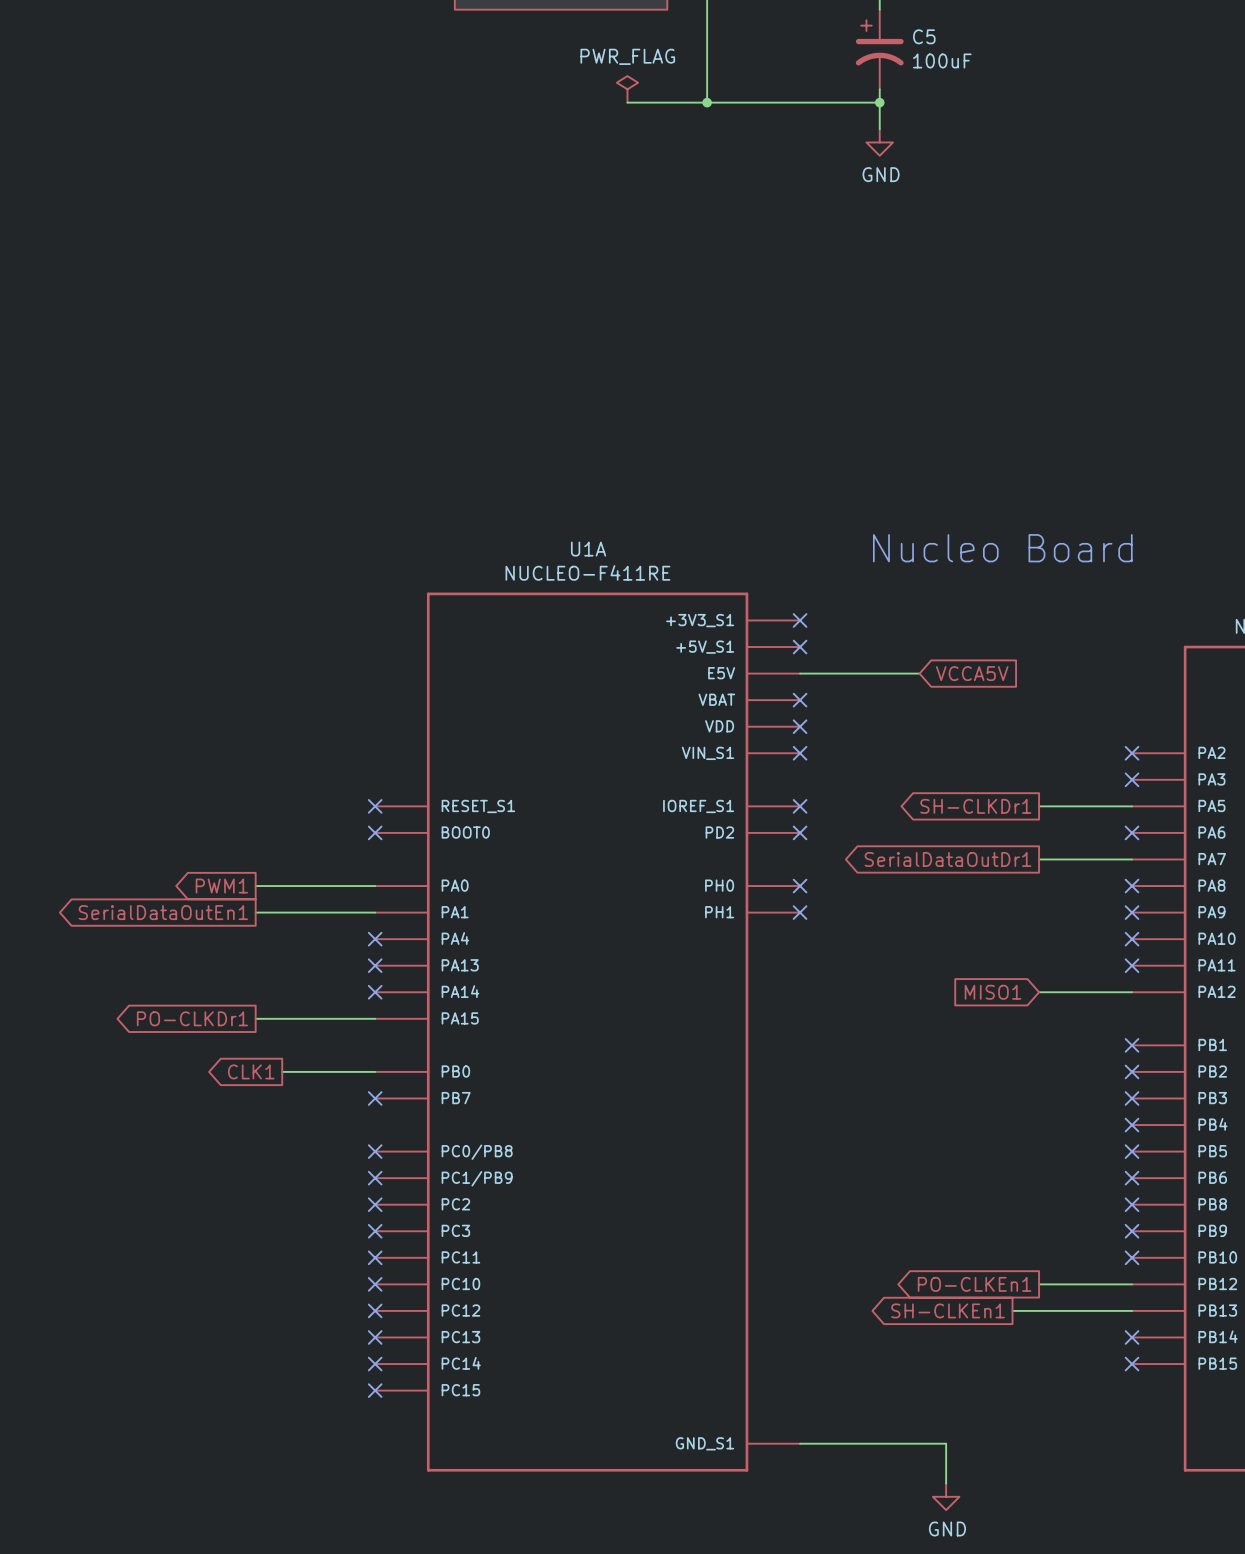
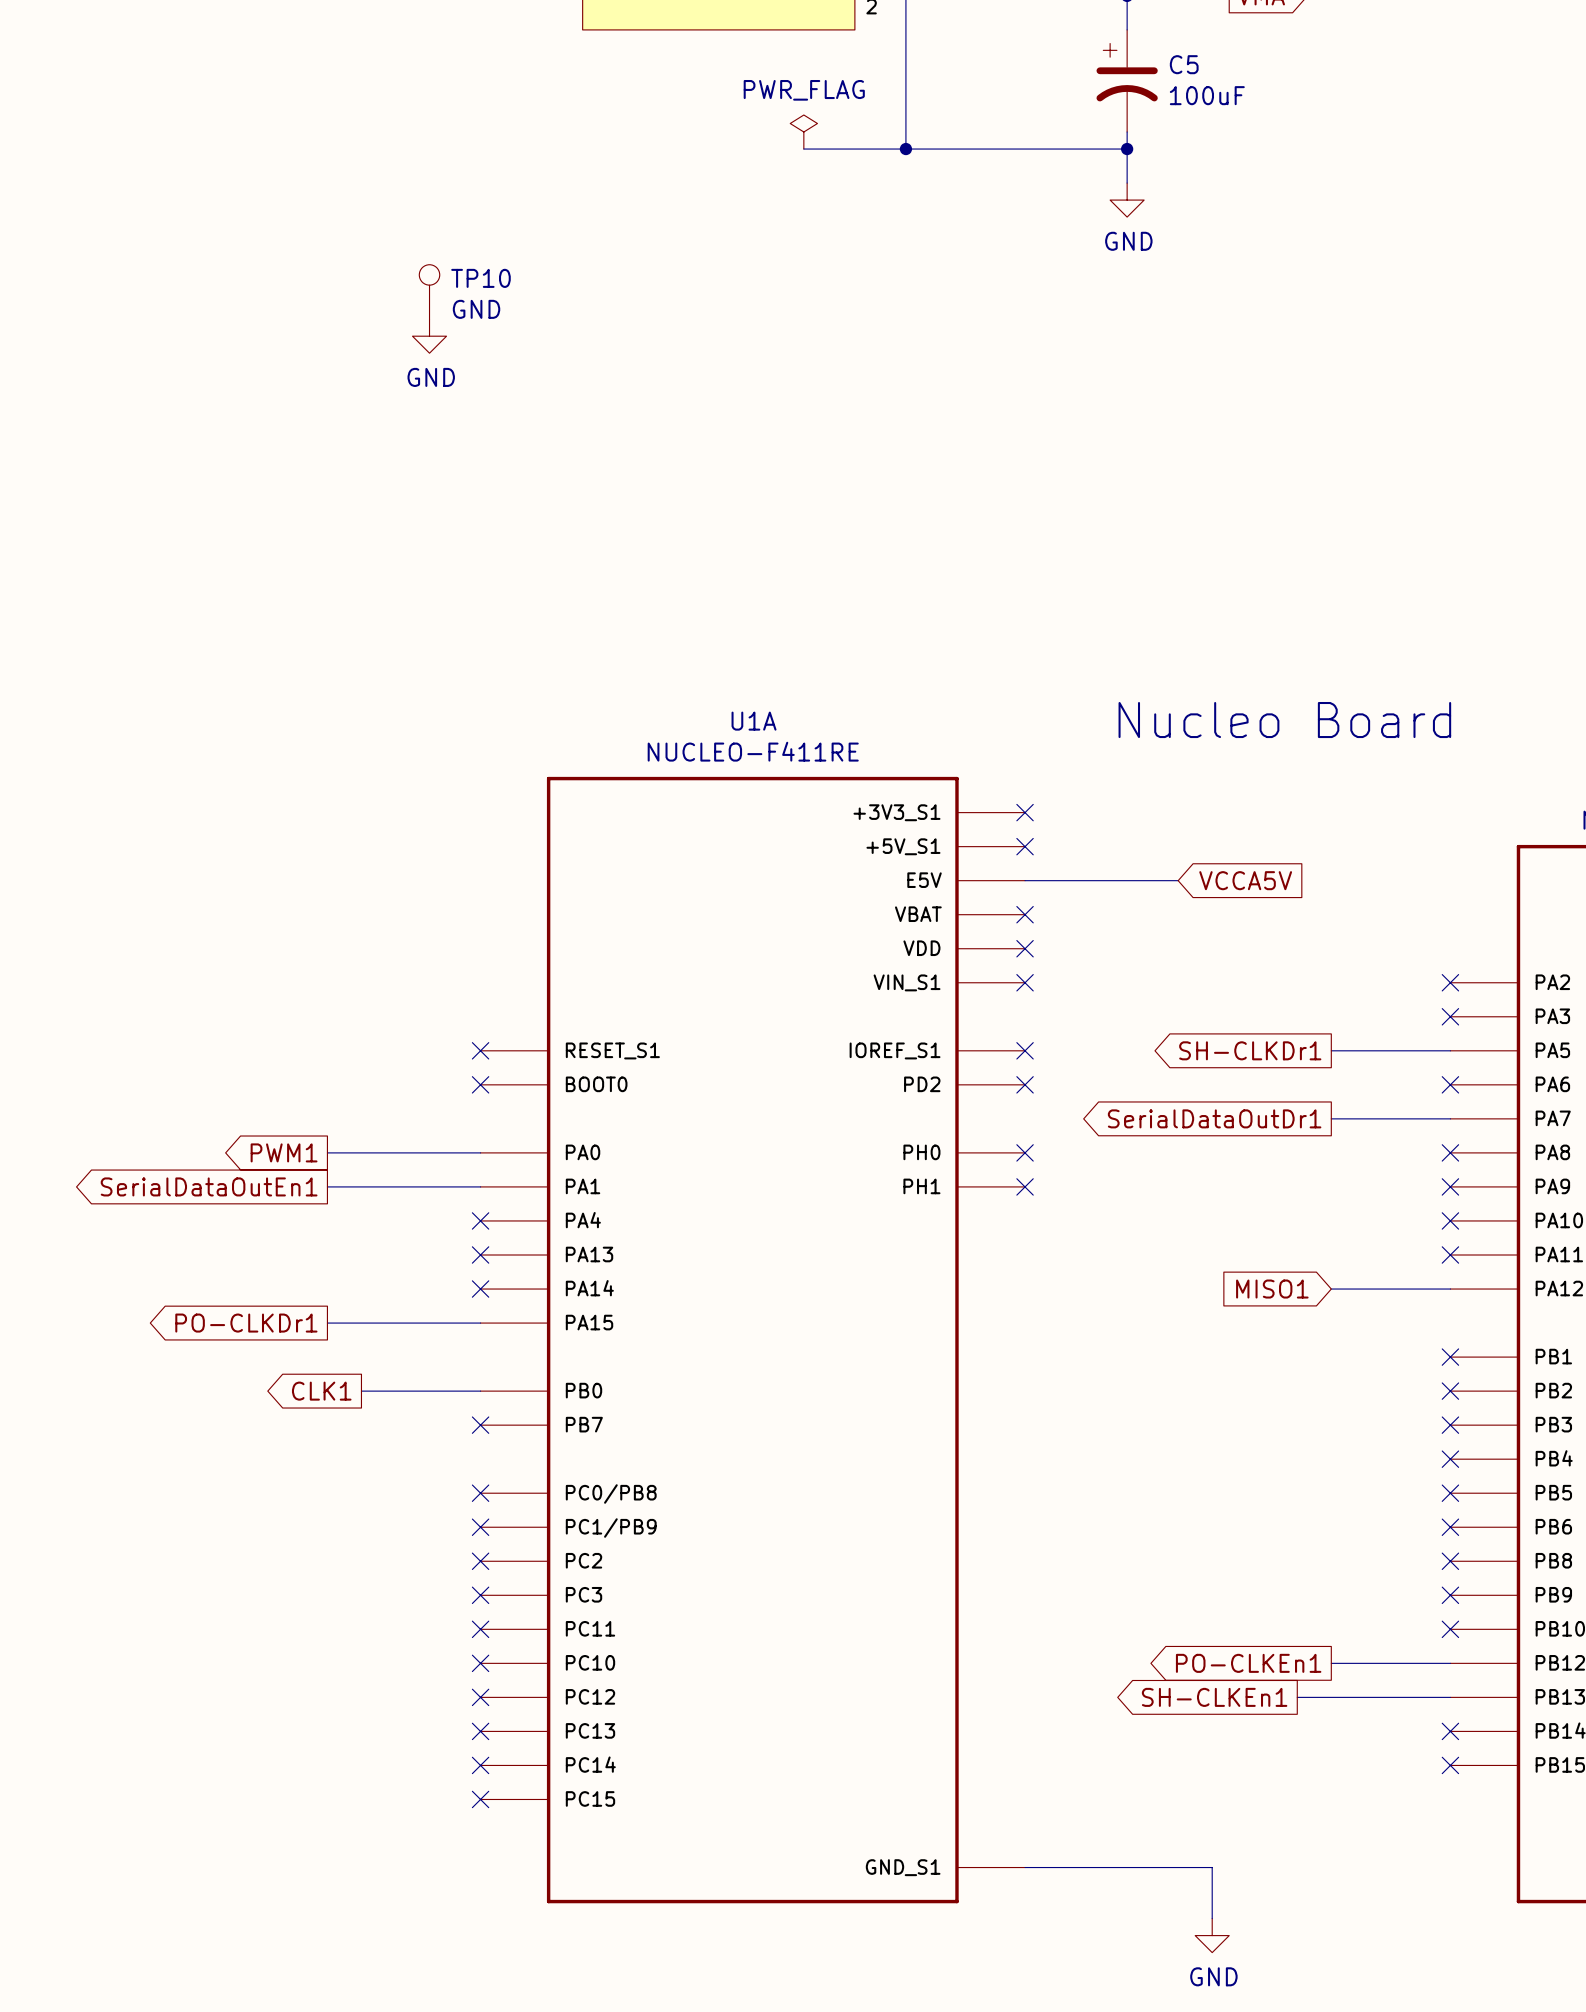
TP10: none -> GND (429, 291)
power symbol: none -> GND (429, 336)

